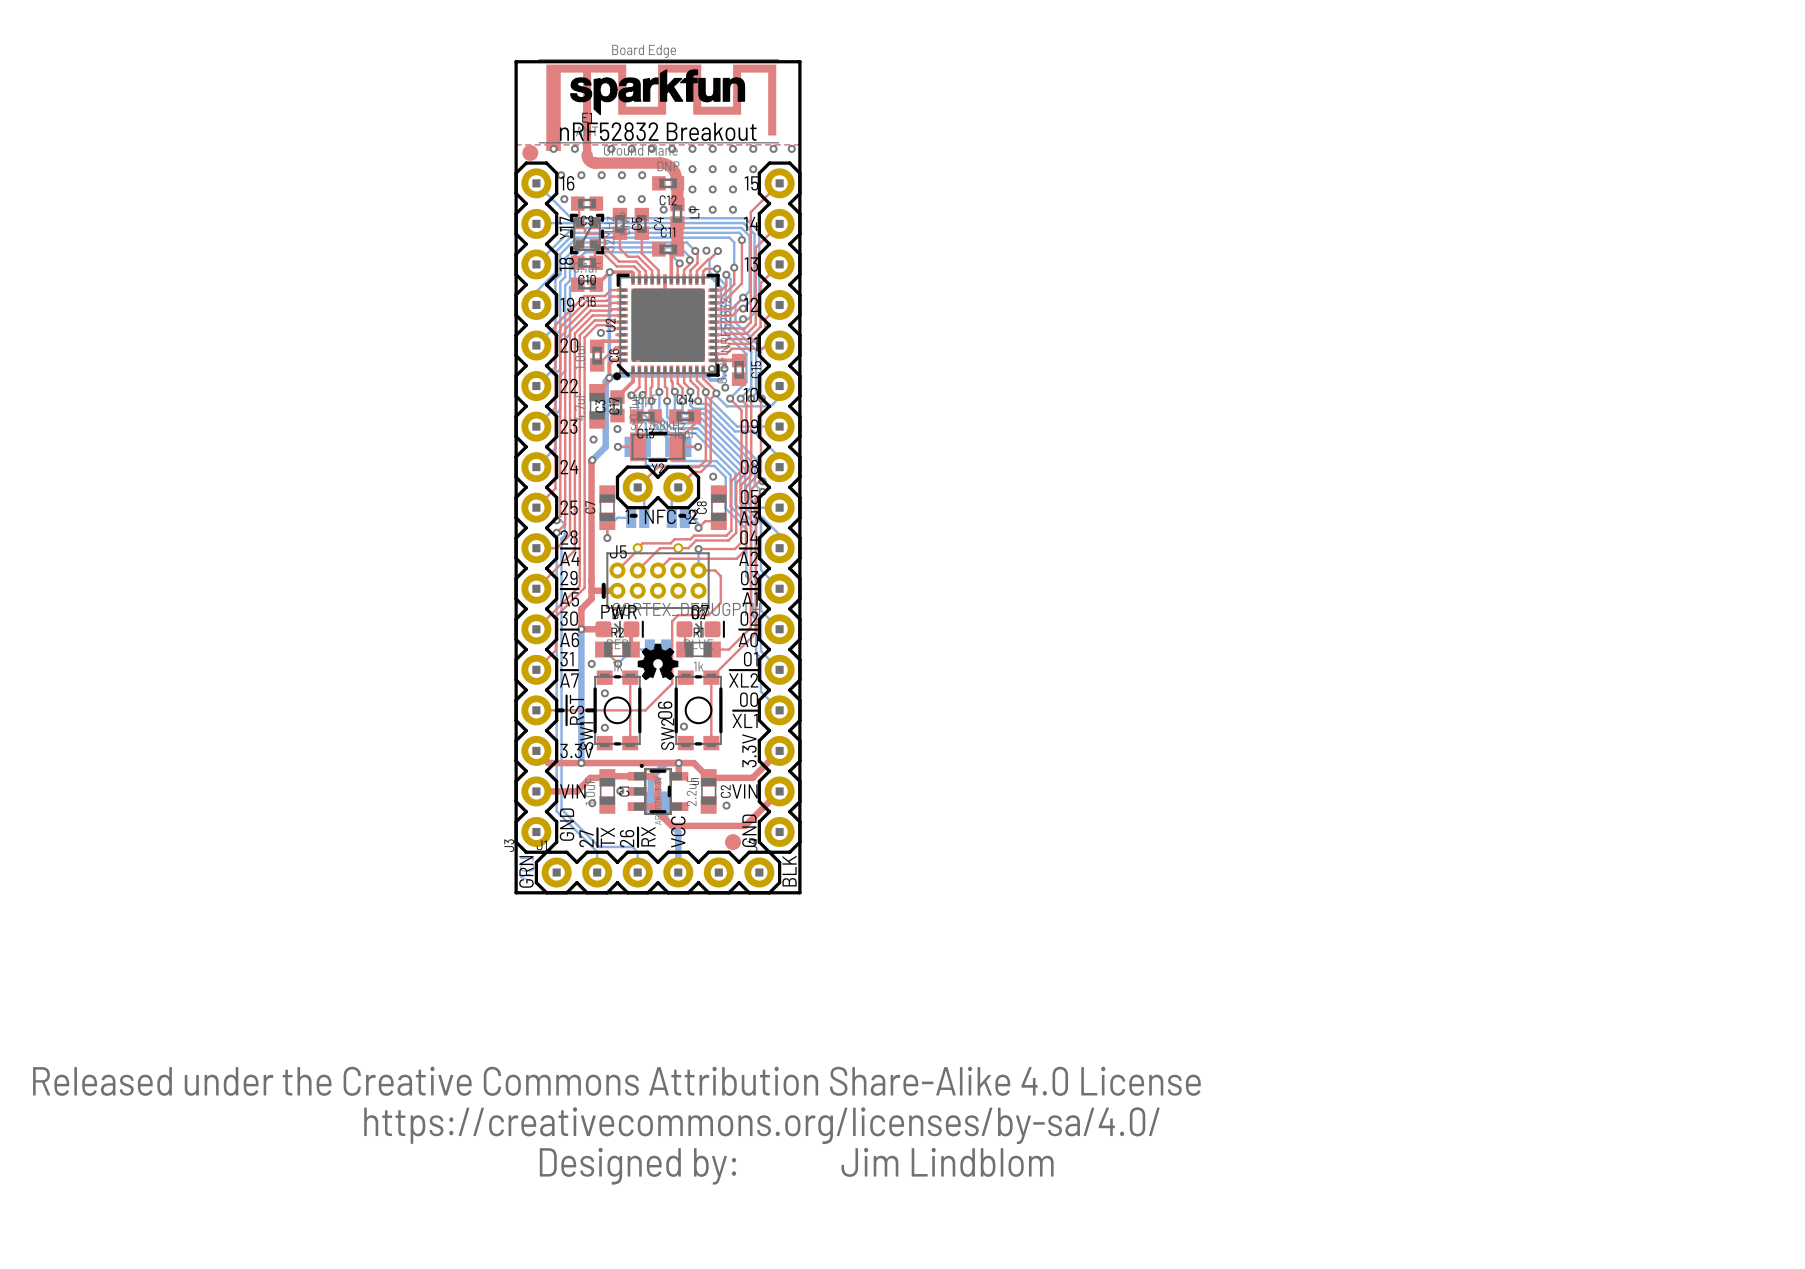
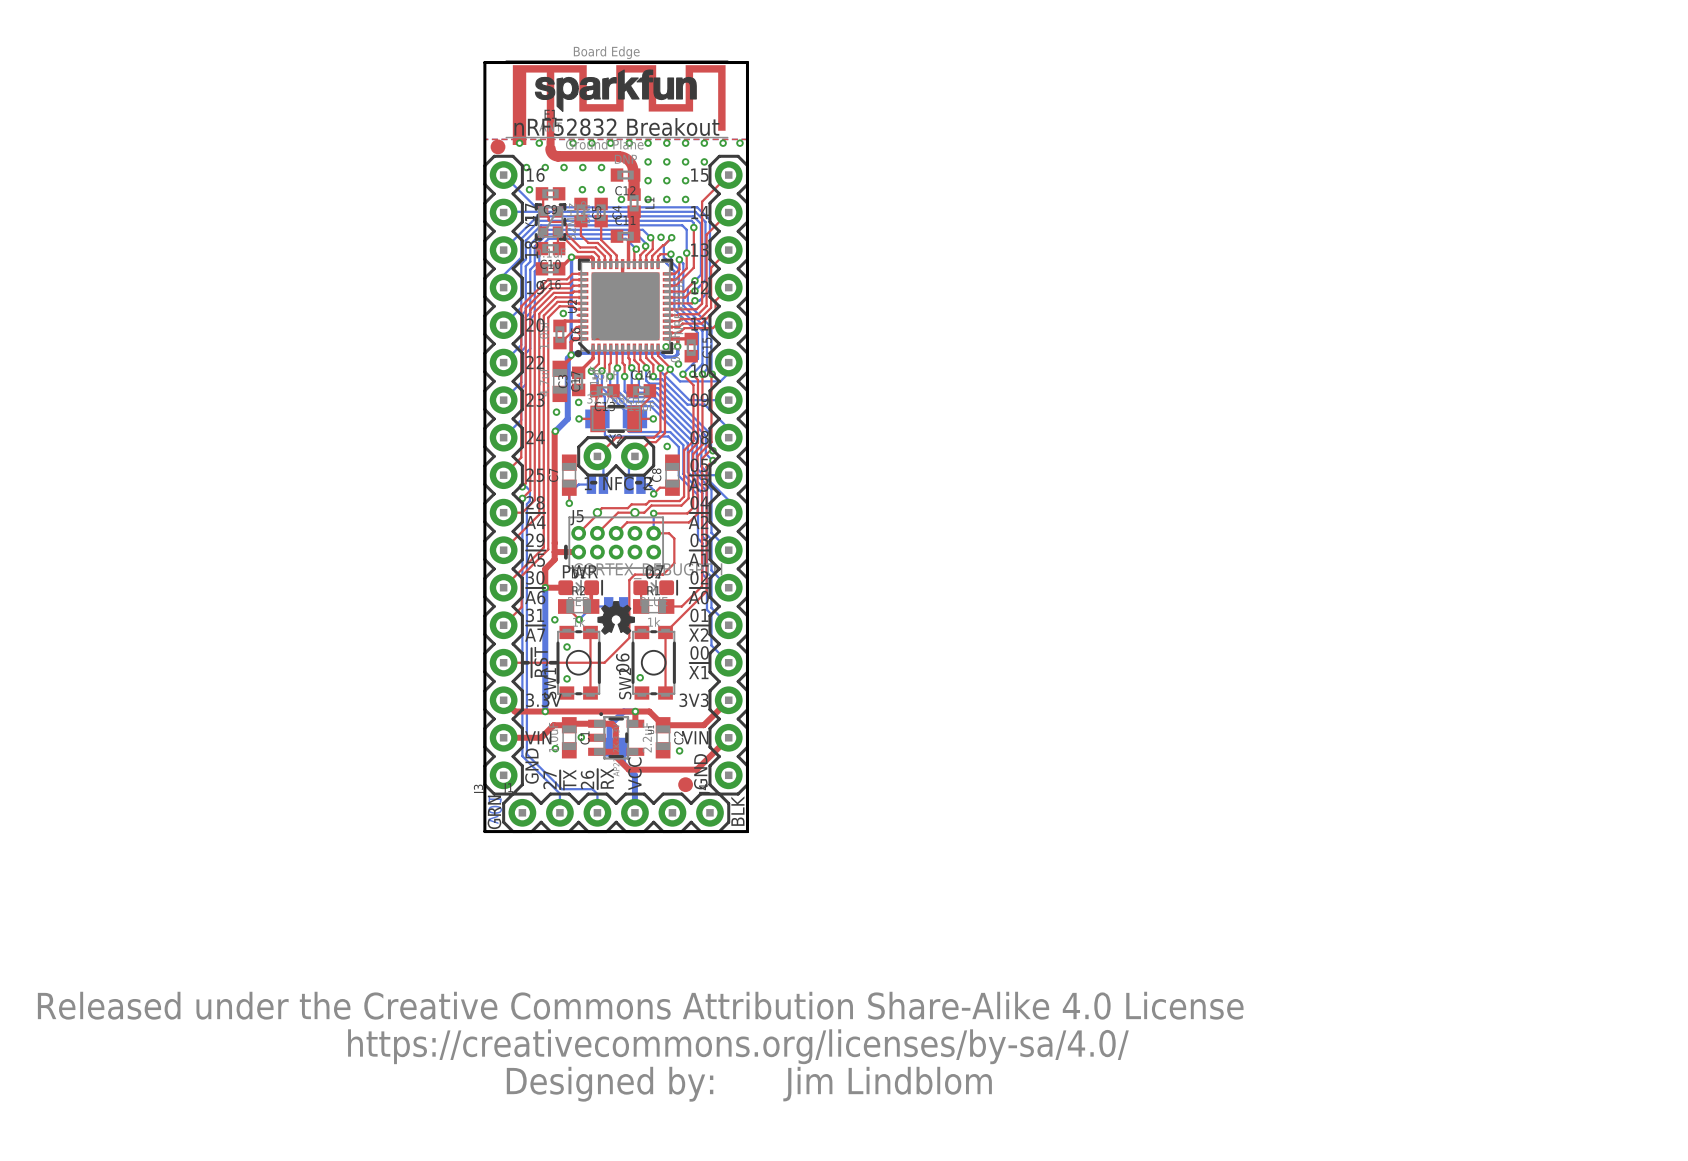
text: ~{XL2} (743, 678) -> ~{X2} (698, 633)
text: ~{XL1} (745, 719) -> ~{X1} (698, 671)
text: 3.3V (749, 750) -> 3V3 (694, 700)

